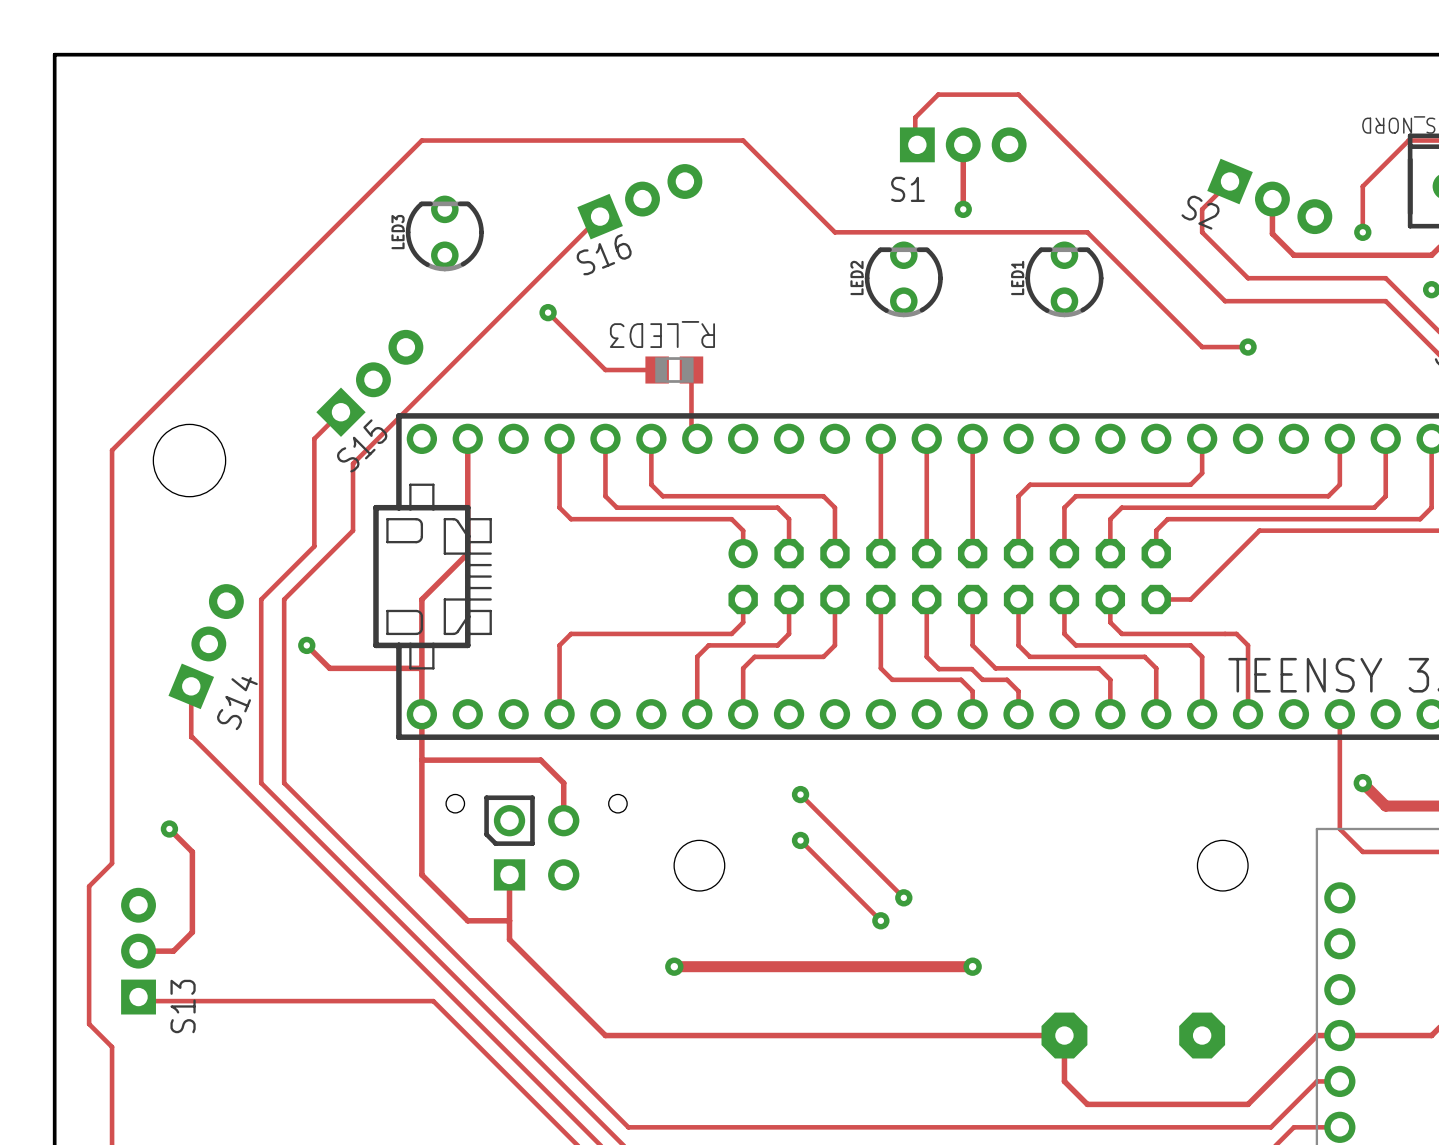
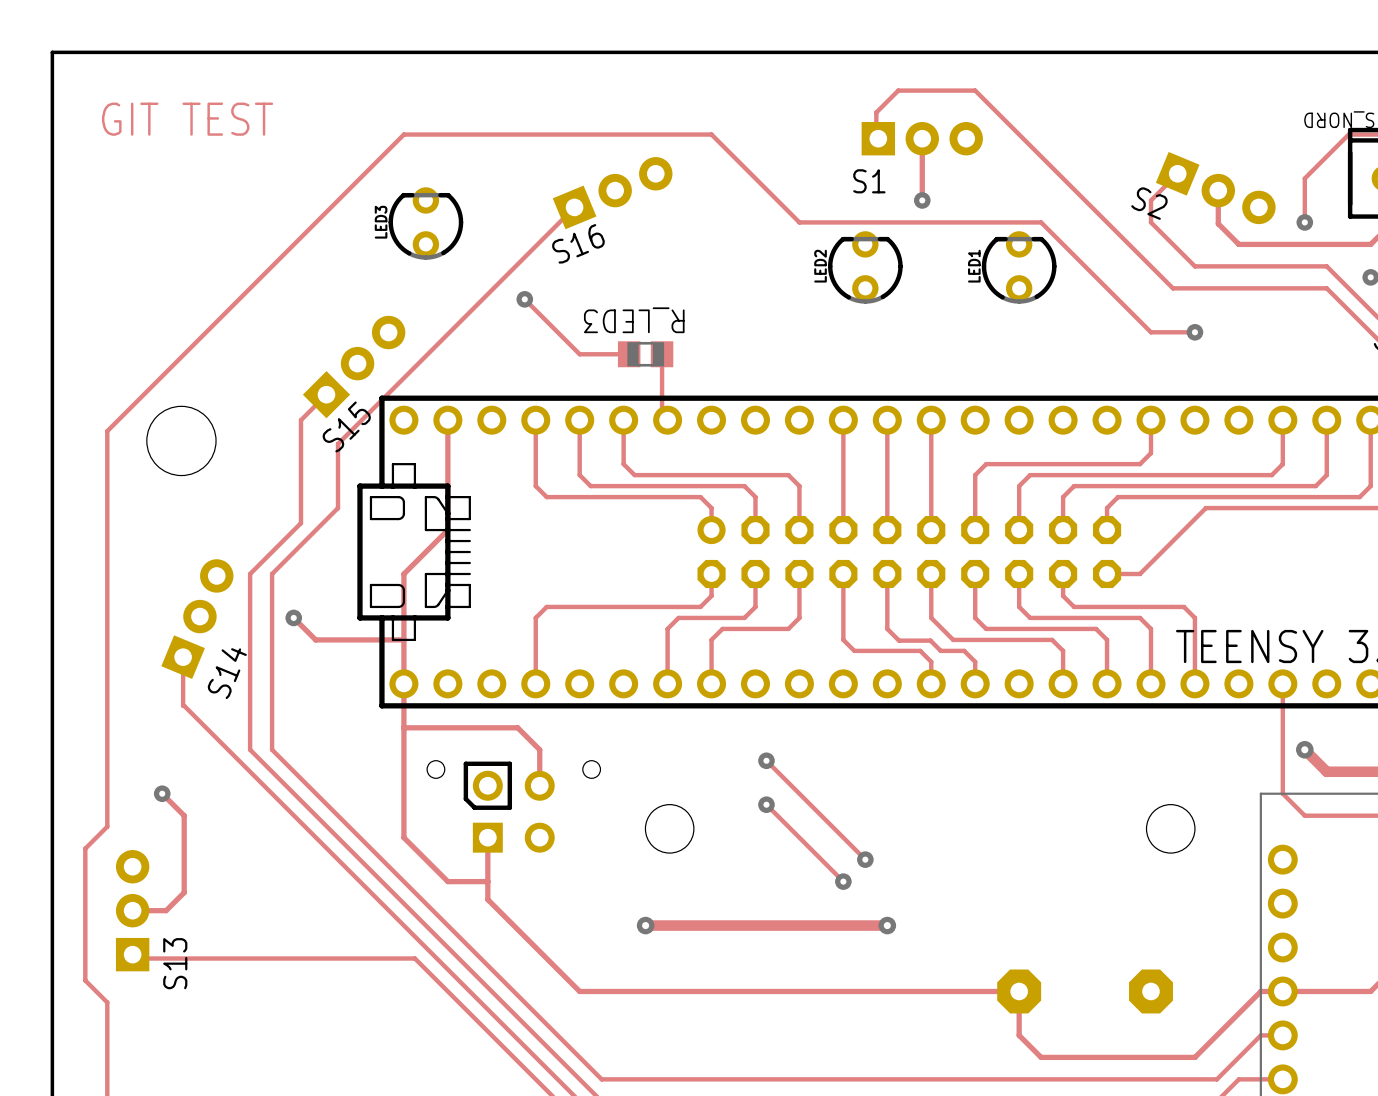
text: none -> GIT TEST (187, 119)
track: (926, 966) (972, 966) -> none
via position: (972, 966) -> (887, 925)

